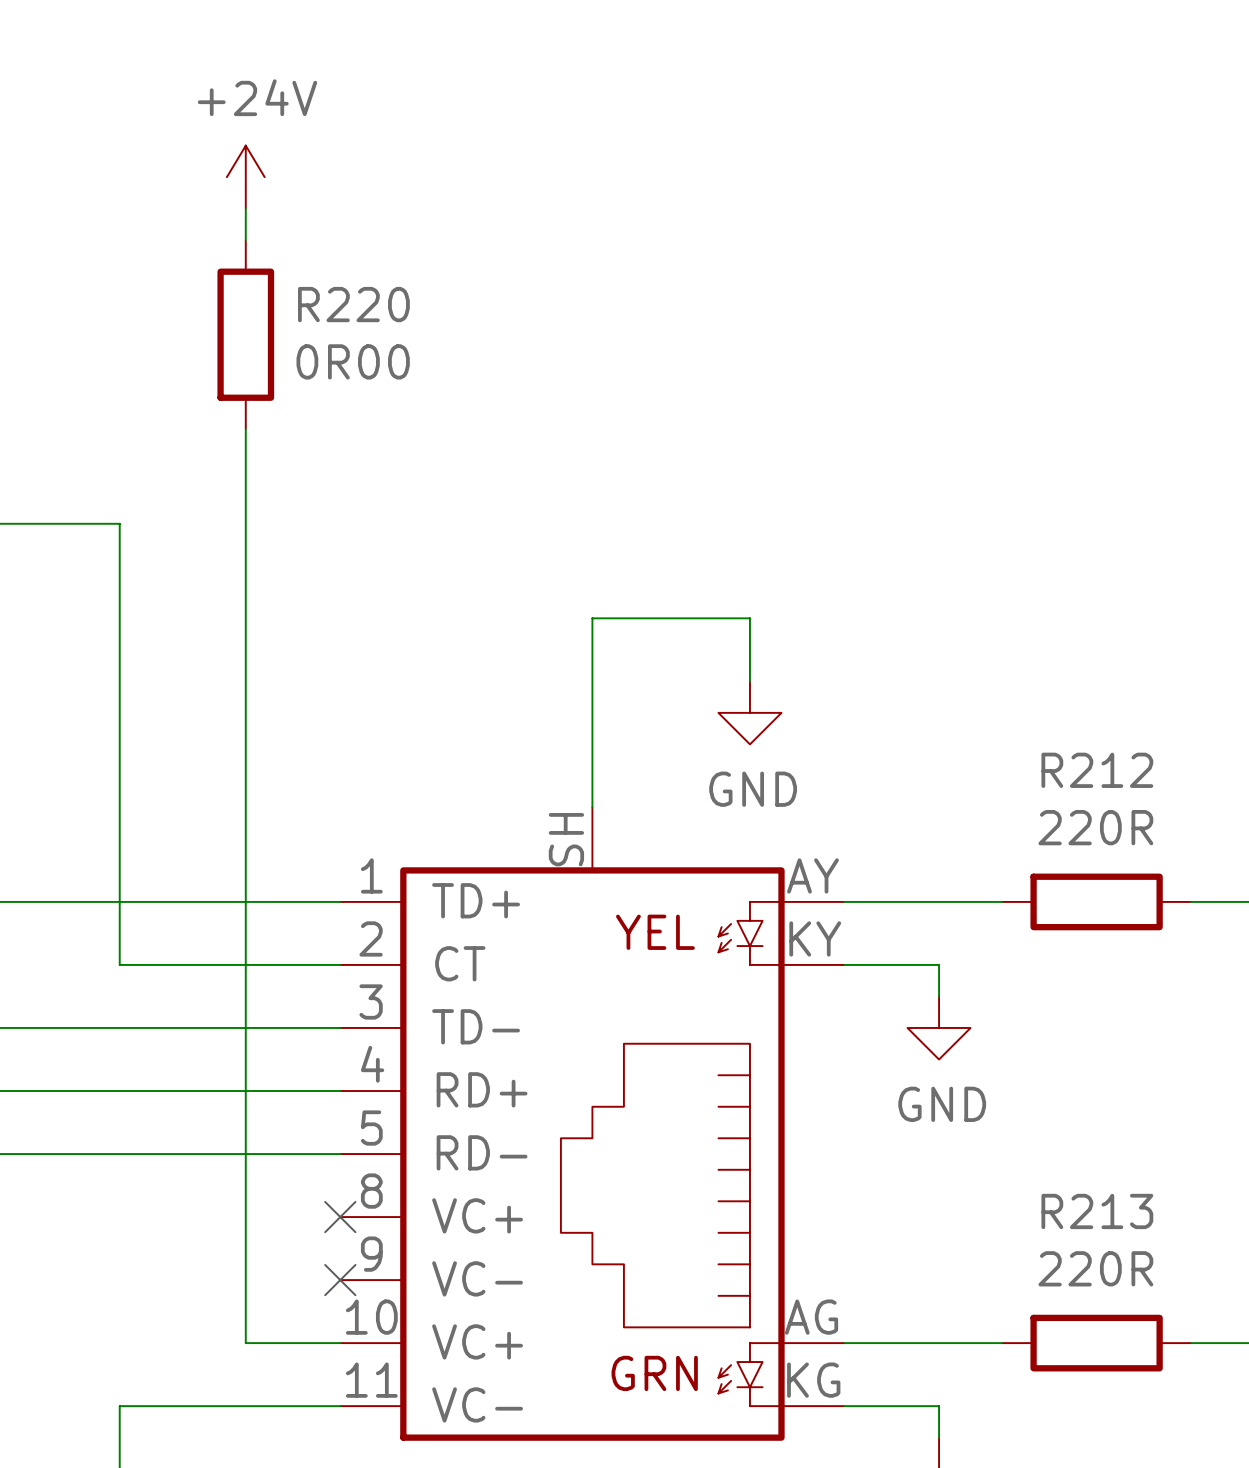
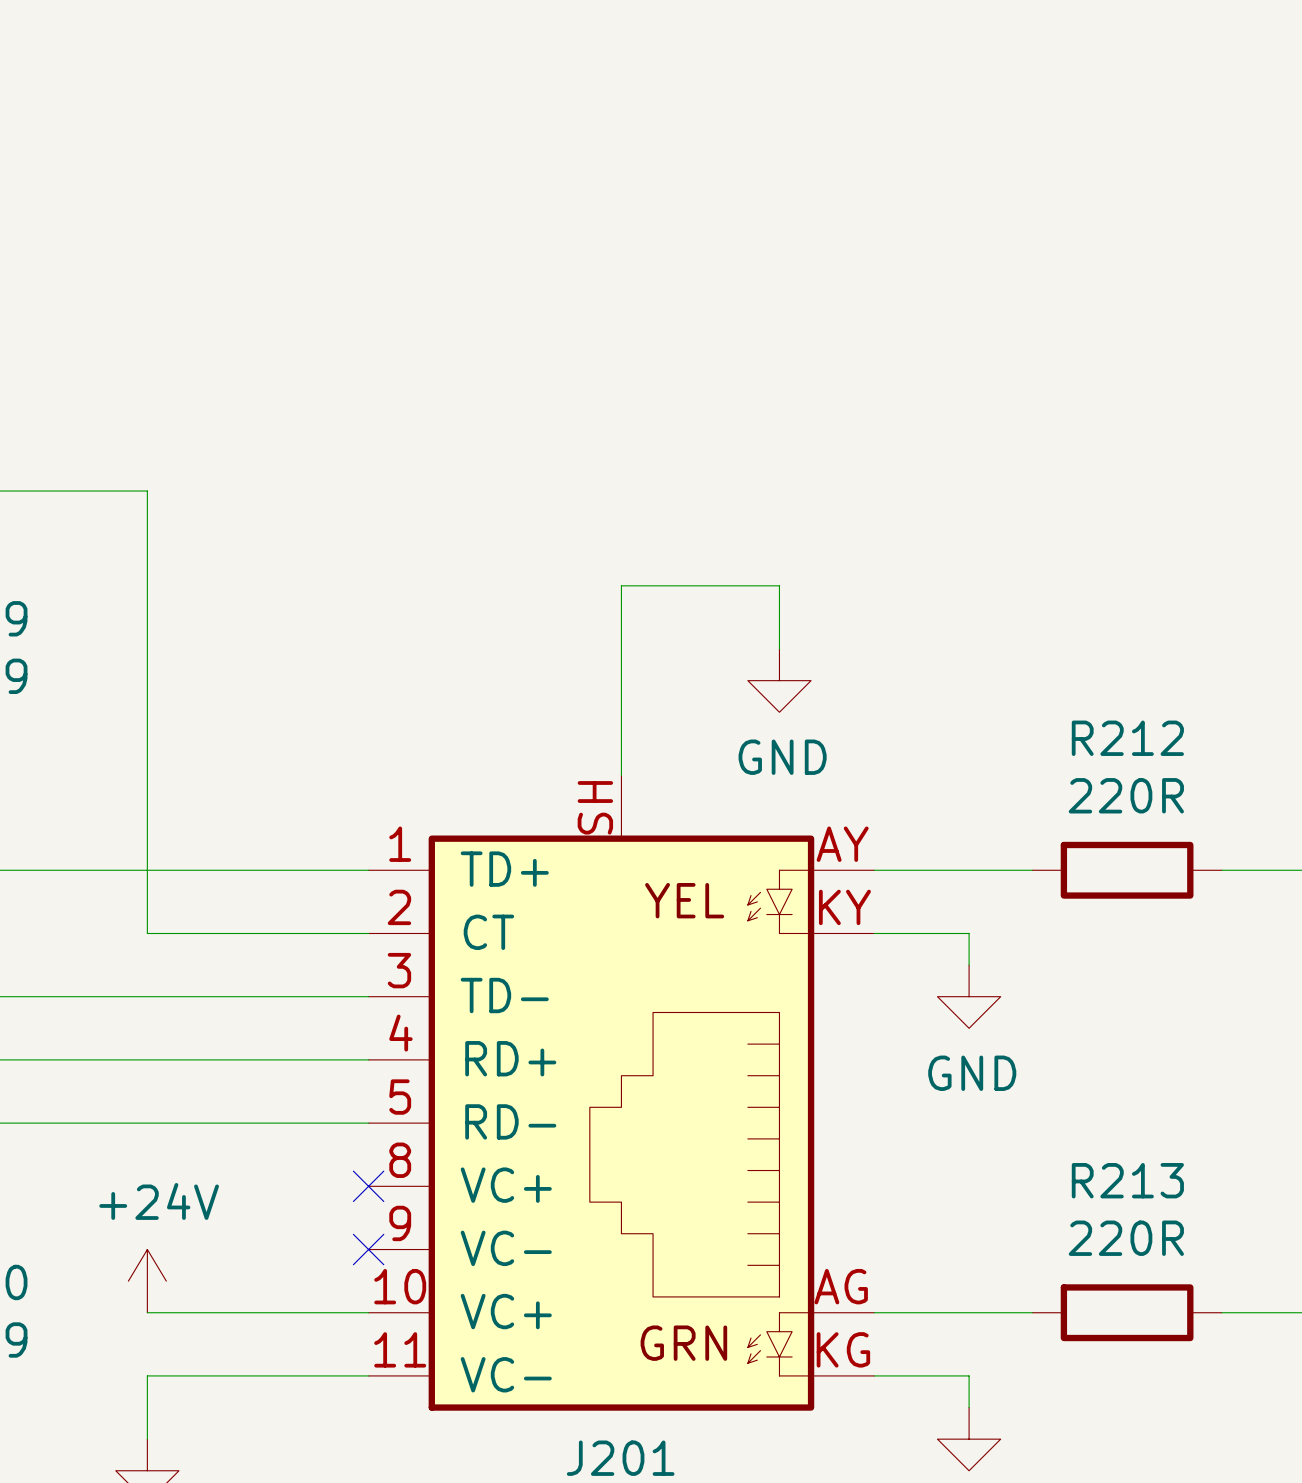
power symbol: +24V (245, 177) -> none
wire: (245, 208) (245, 240) -> none
R220: 0R00 (245, 334) -> none
wire: (245, 429) (245, 1343) -> (147, 1312) (273, 1312)
power symbol: none -> +24V (147, 1281)

